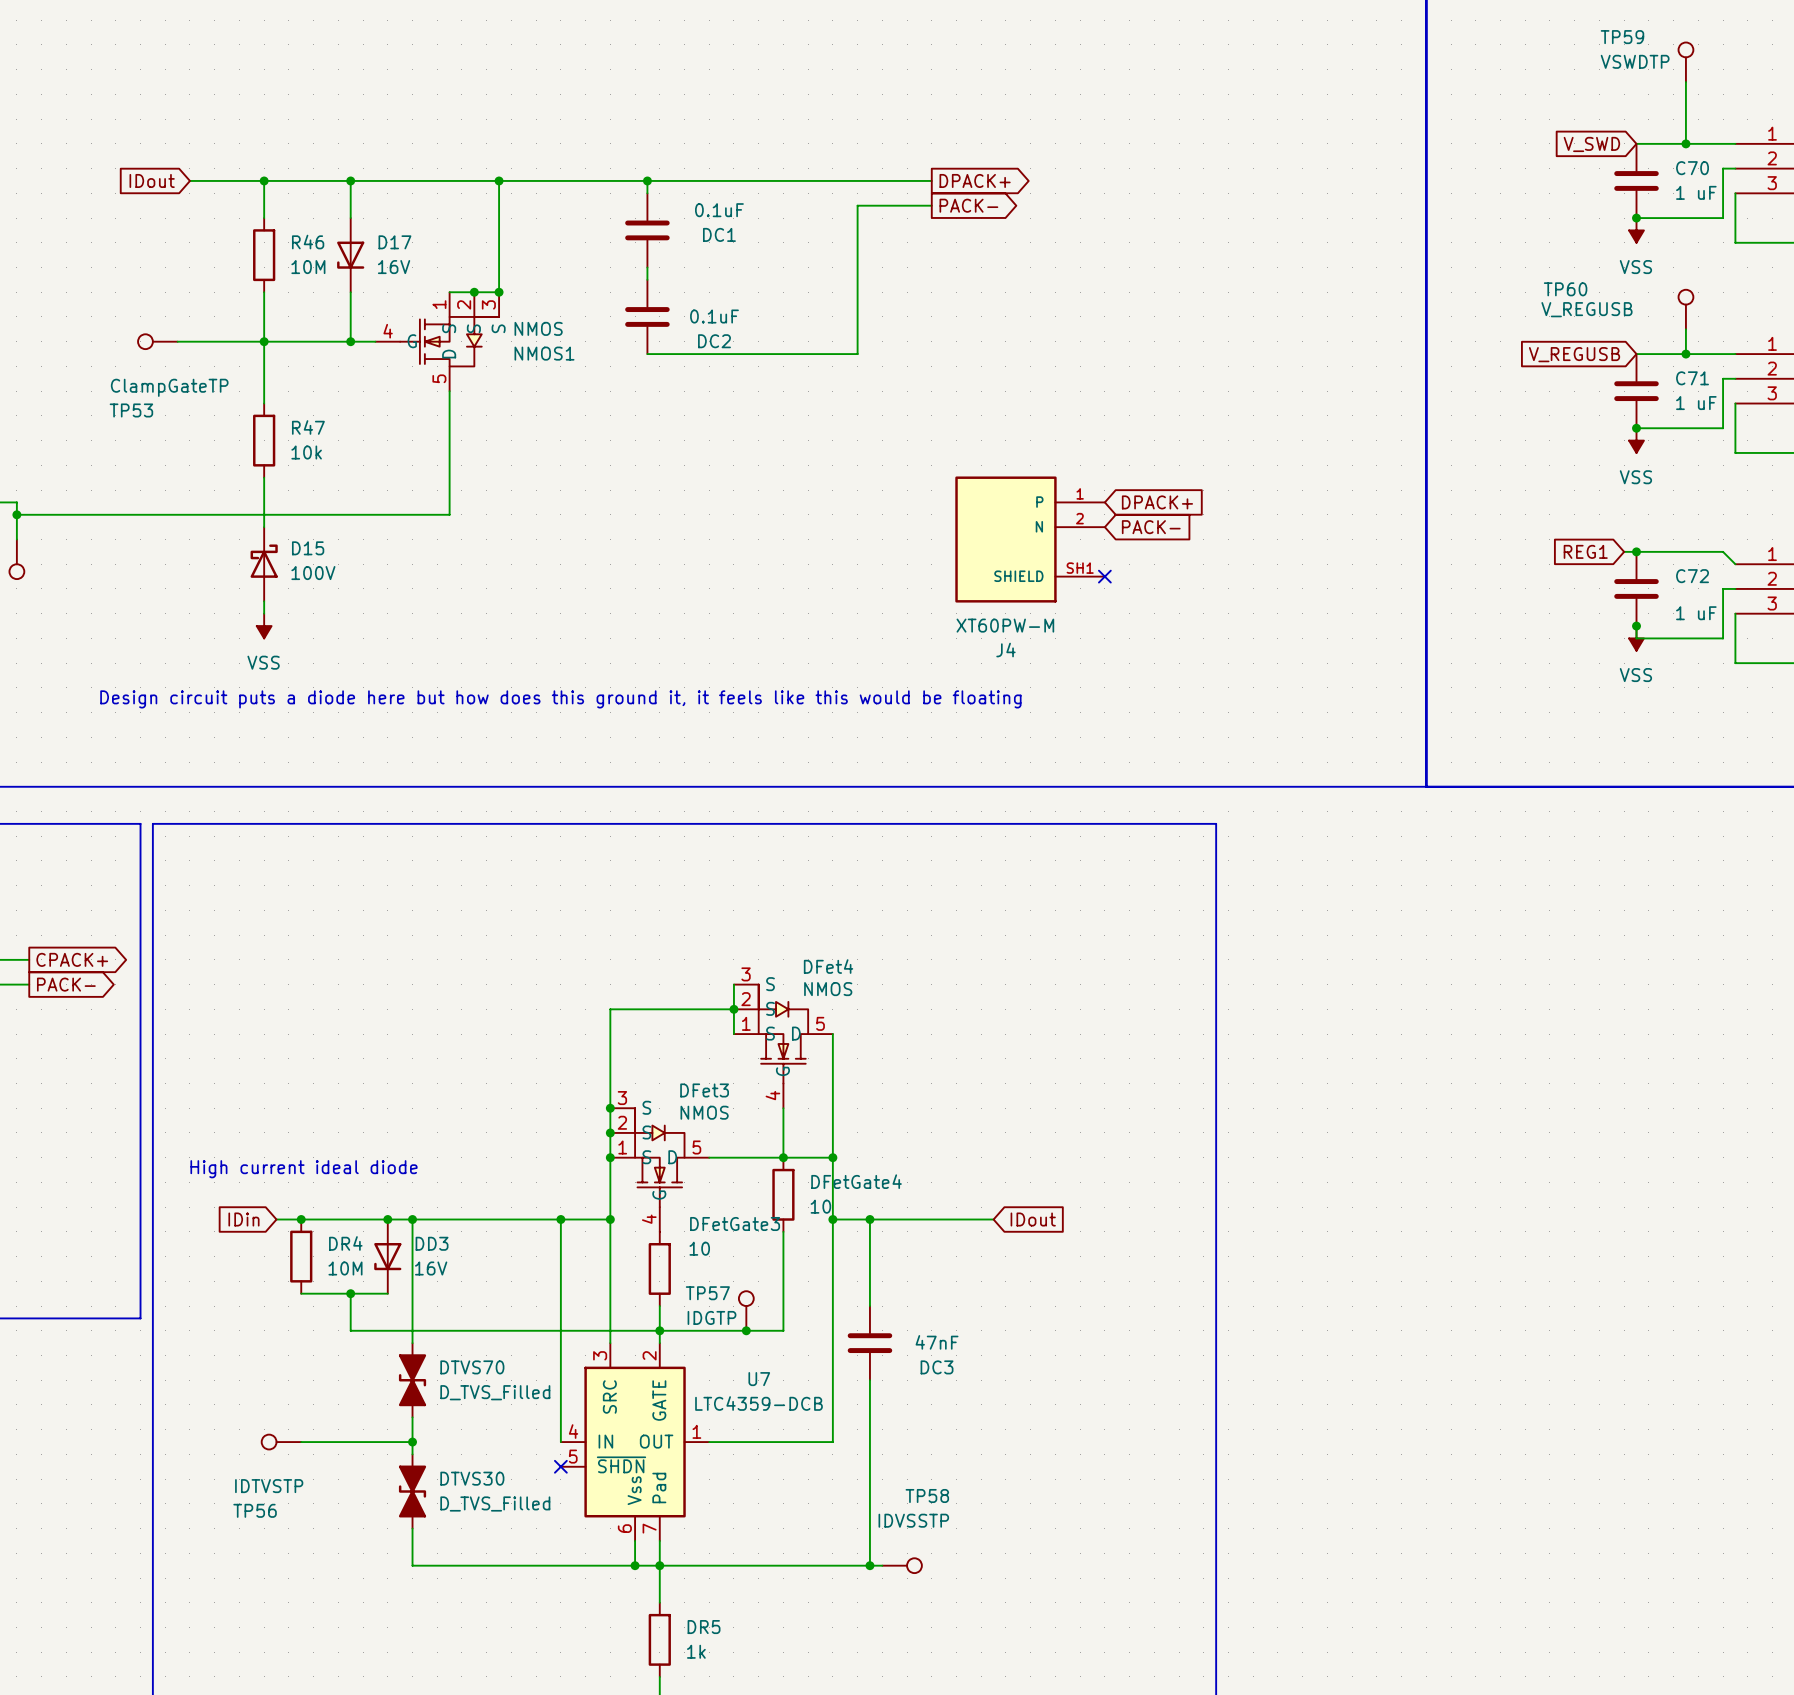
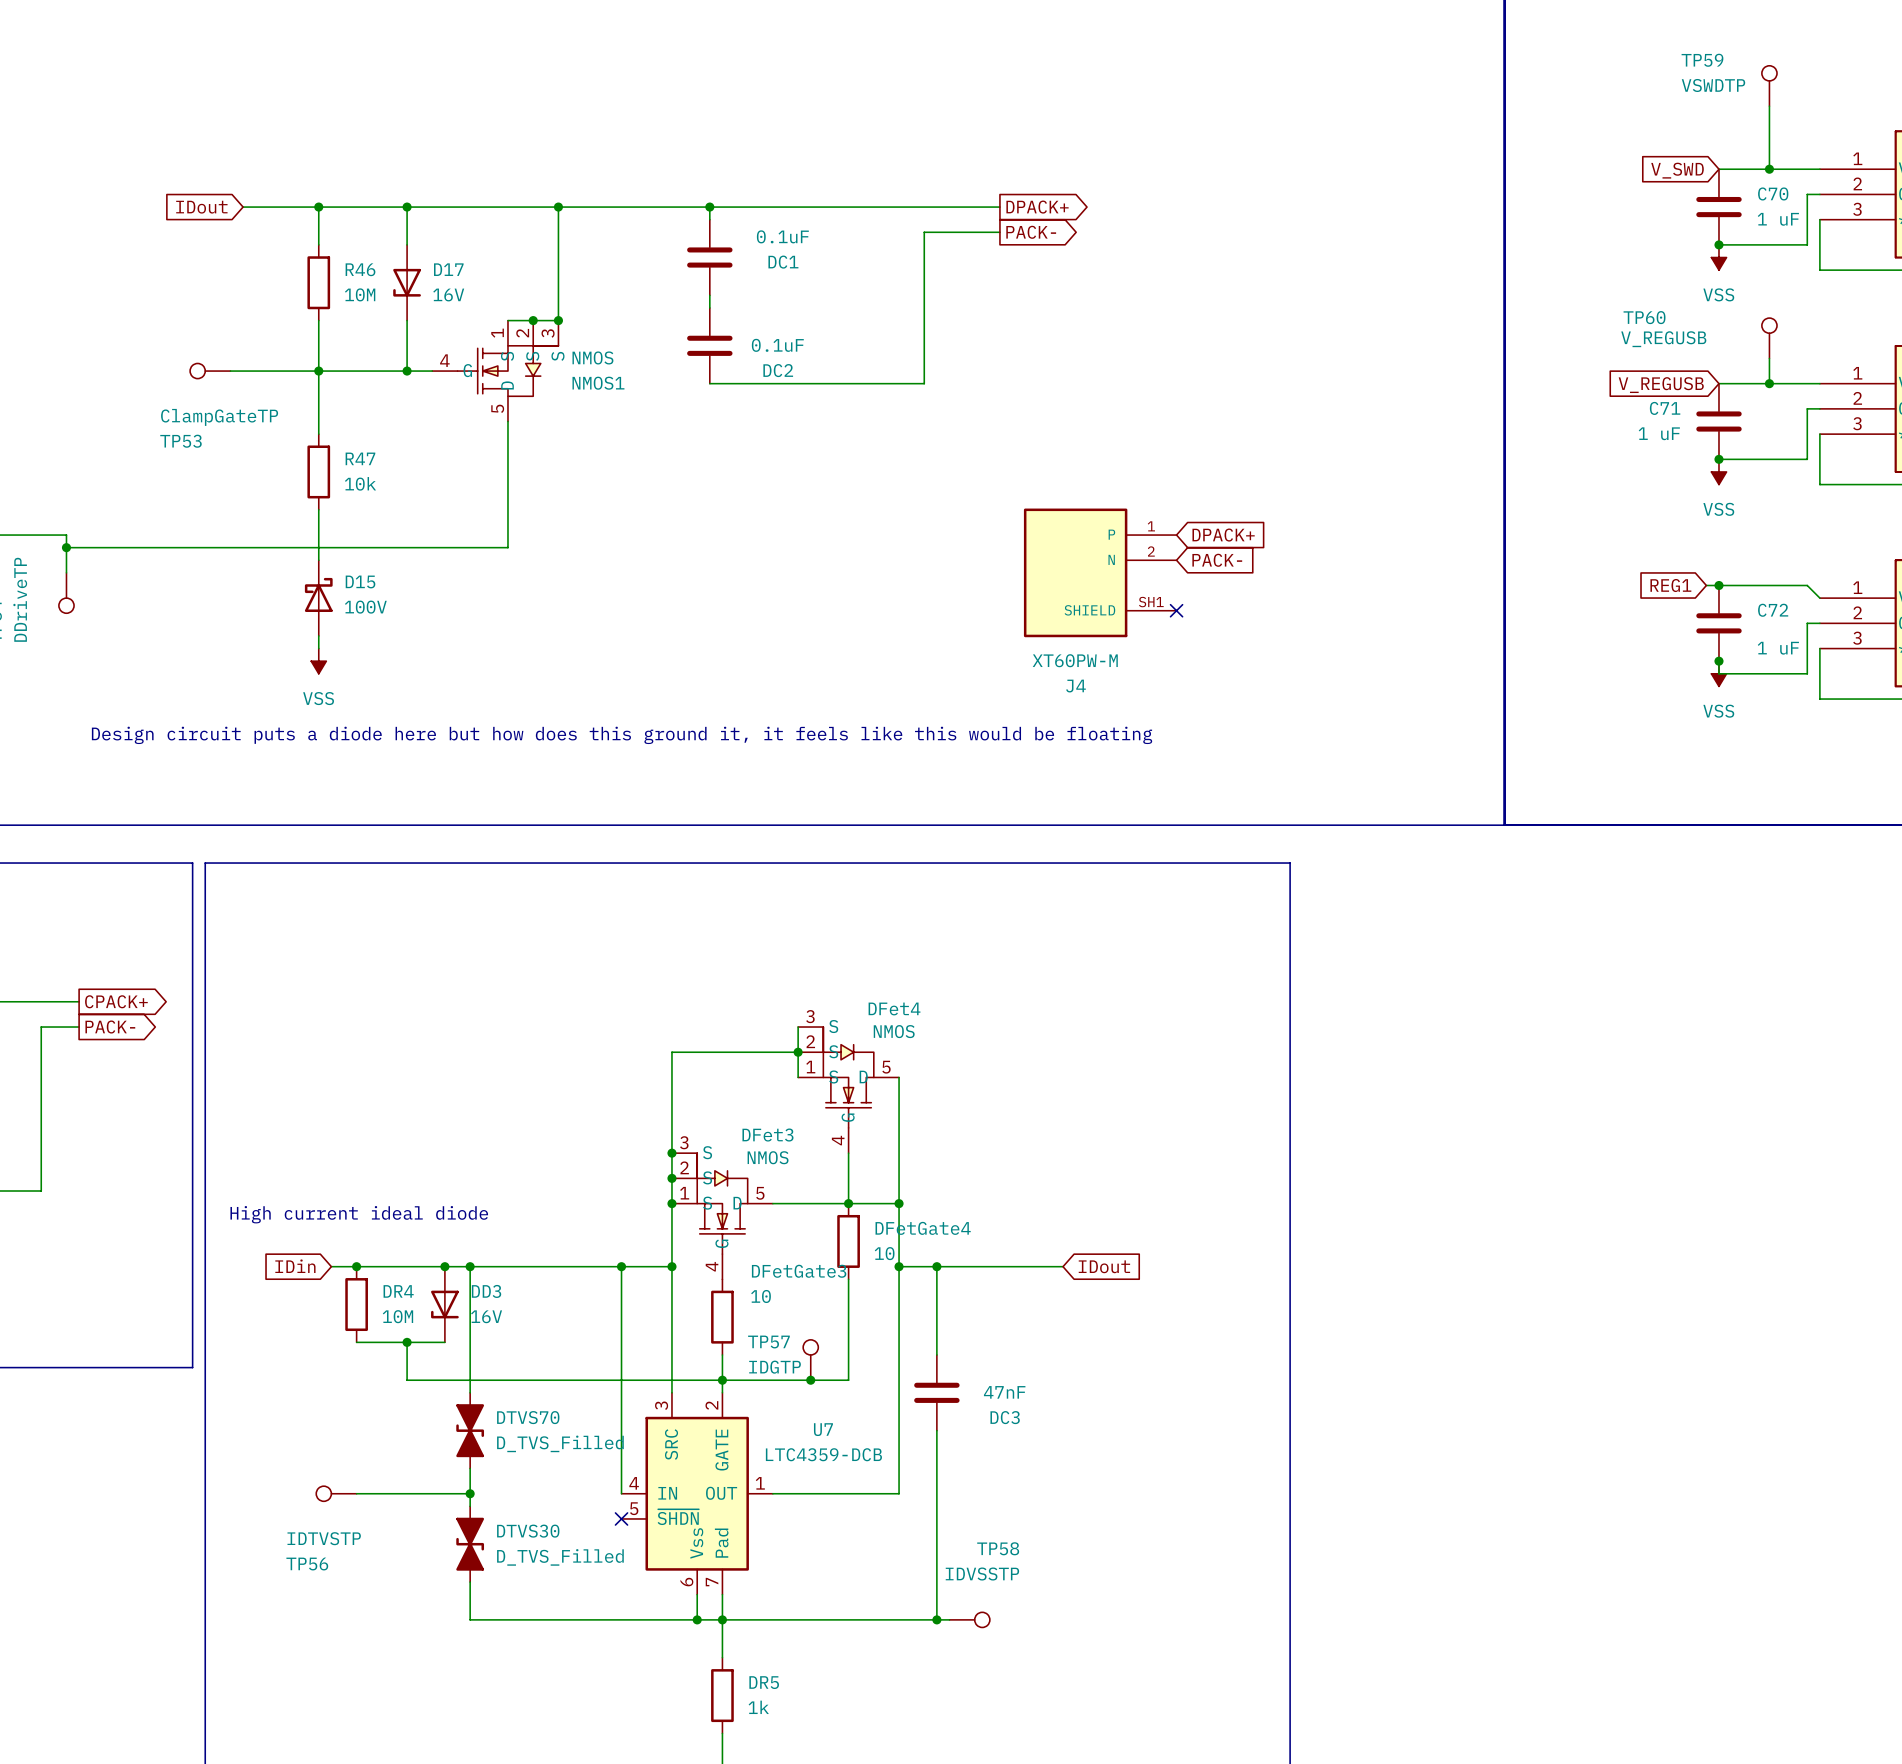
C71 name position: C71 (1692, 378) -> C71 (1665, 408)
C71 value position: 1 uF (1696, 403) -> 1 uF (1659, 433)

